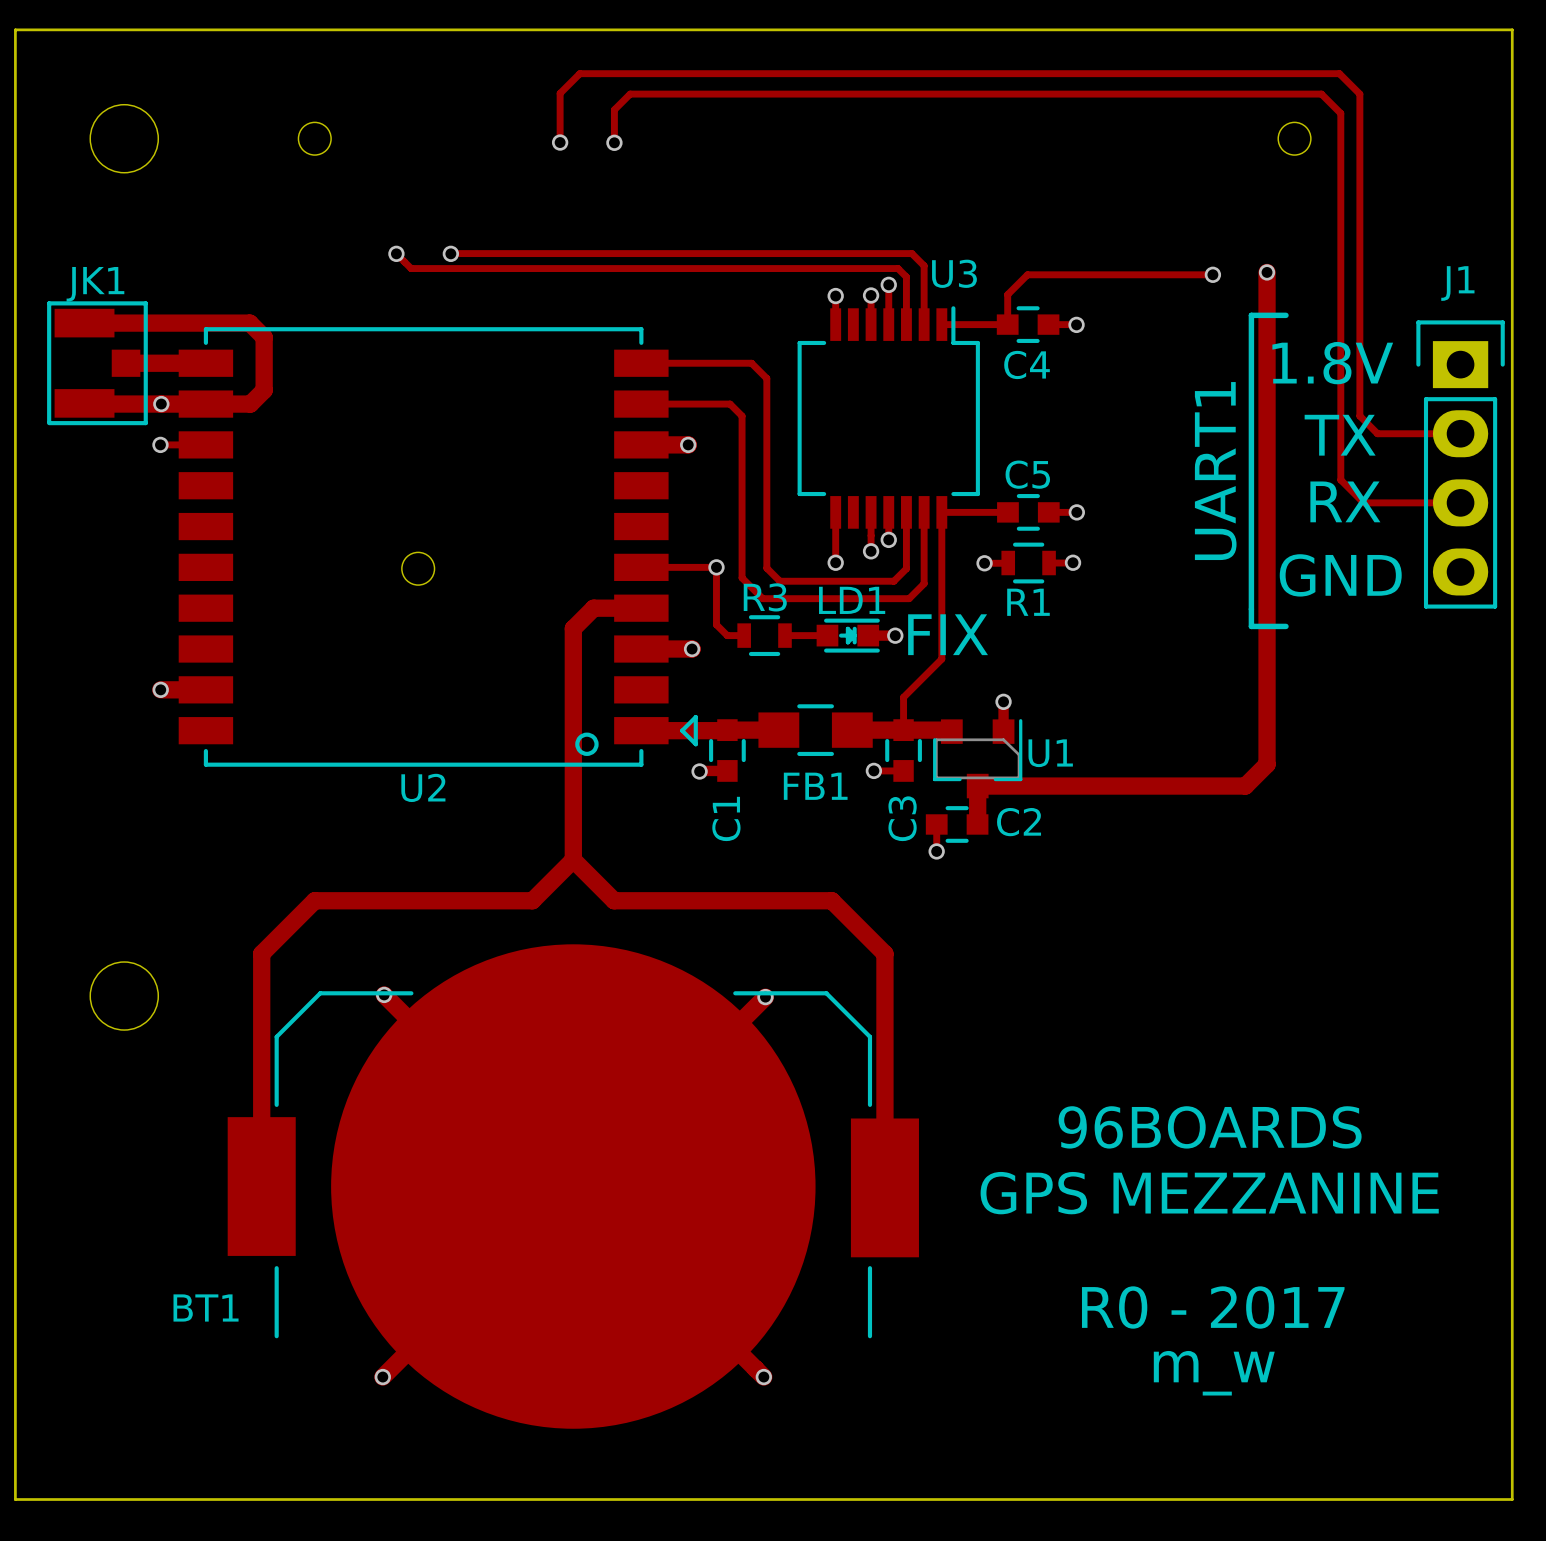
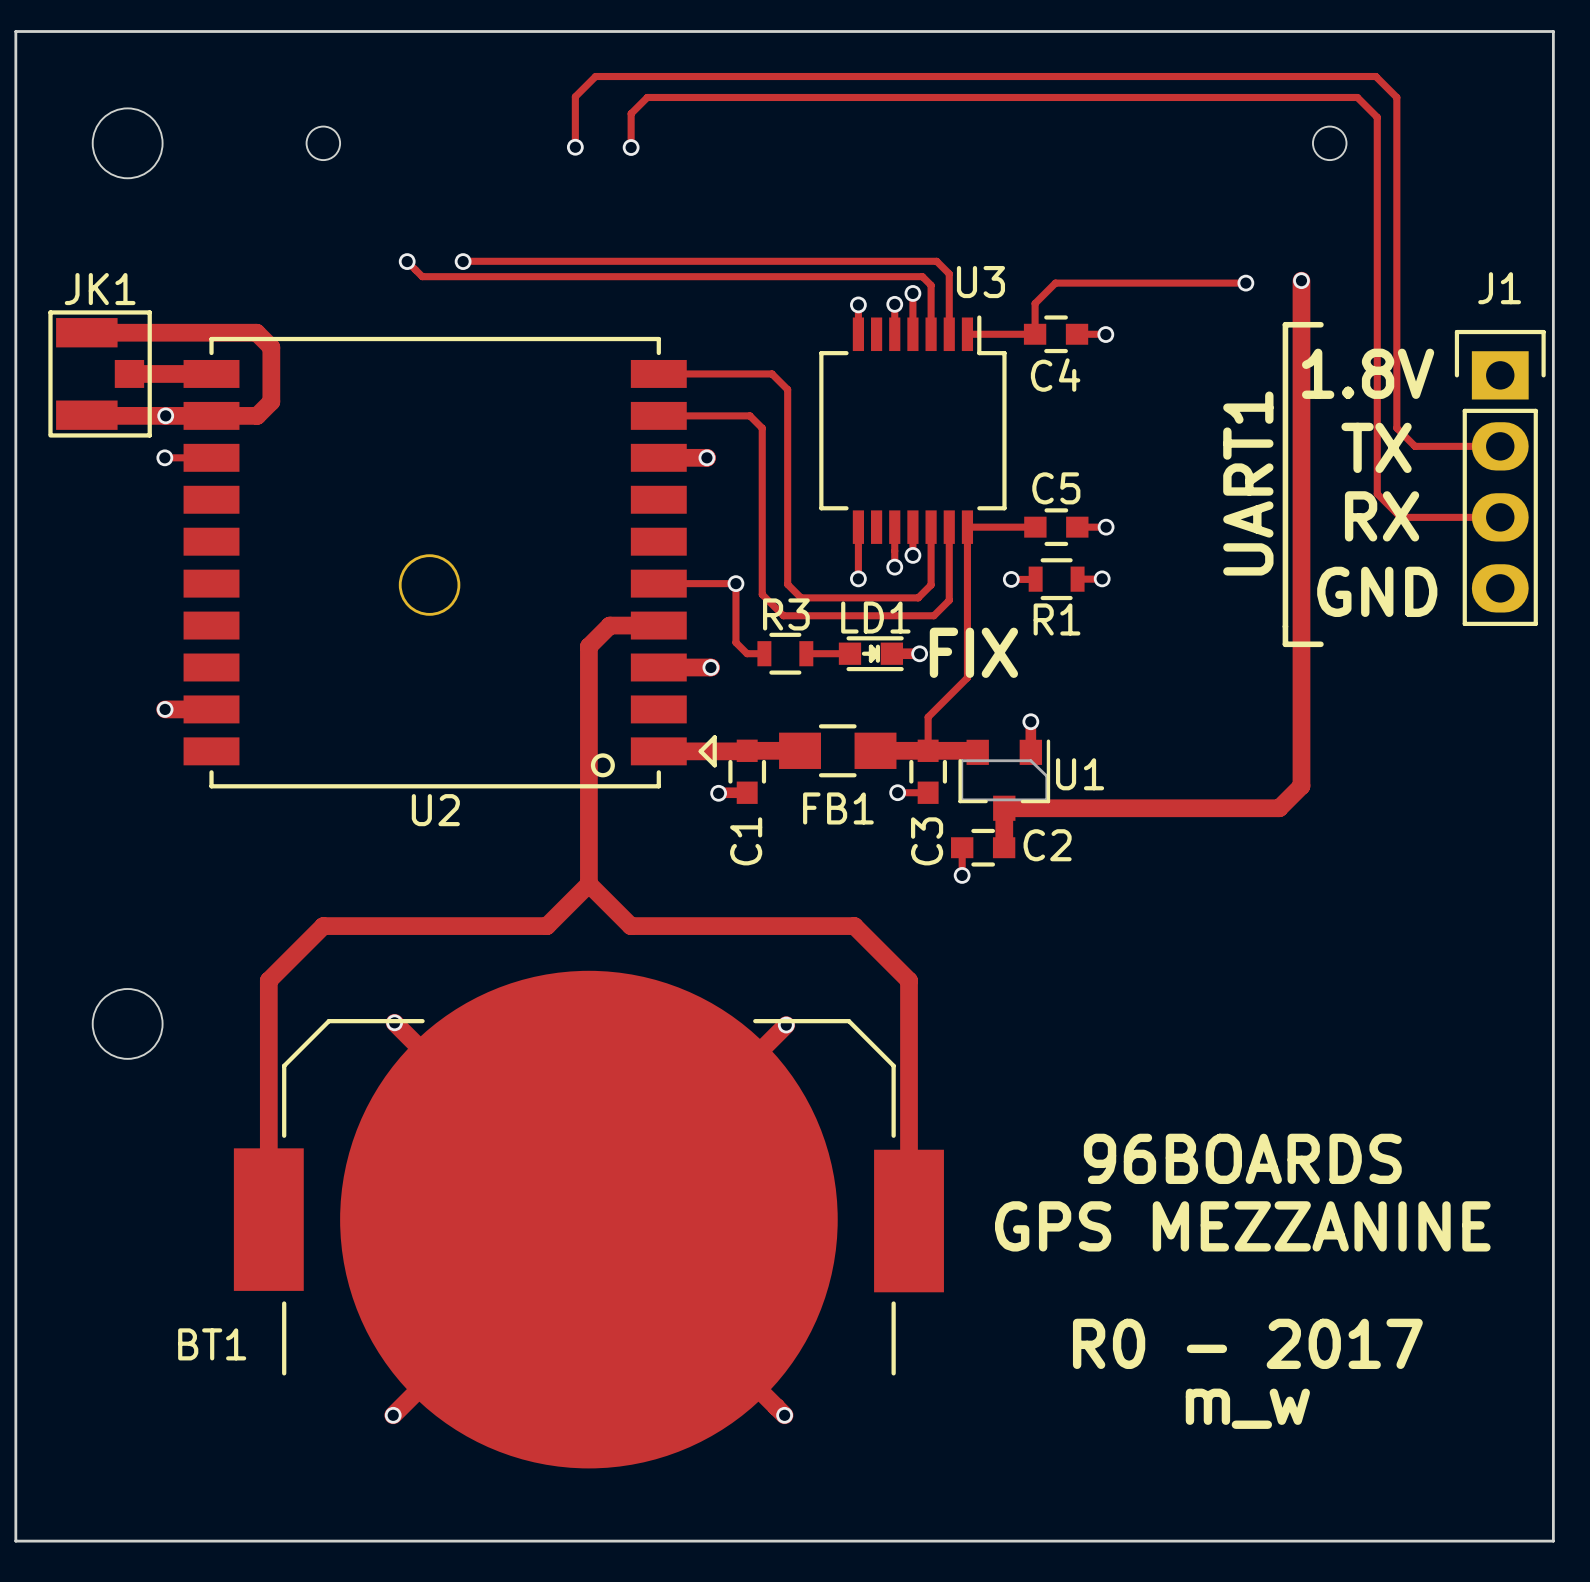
U2 footprint: [178, 327, 698, 767] -> [183, 336, 717, 789]

